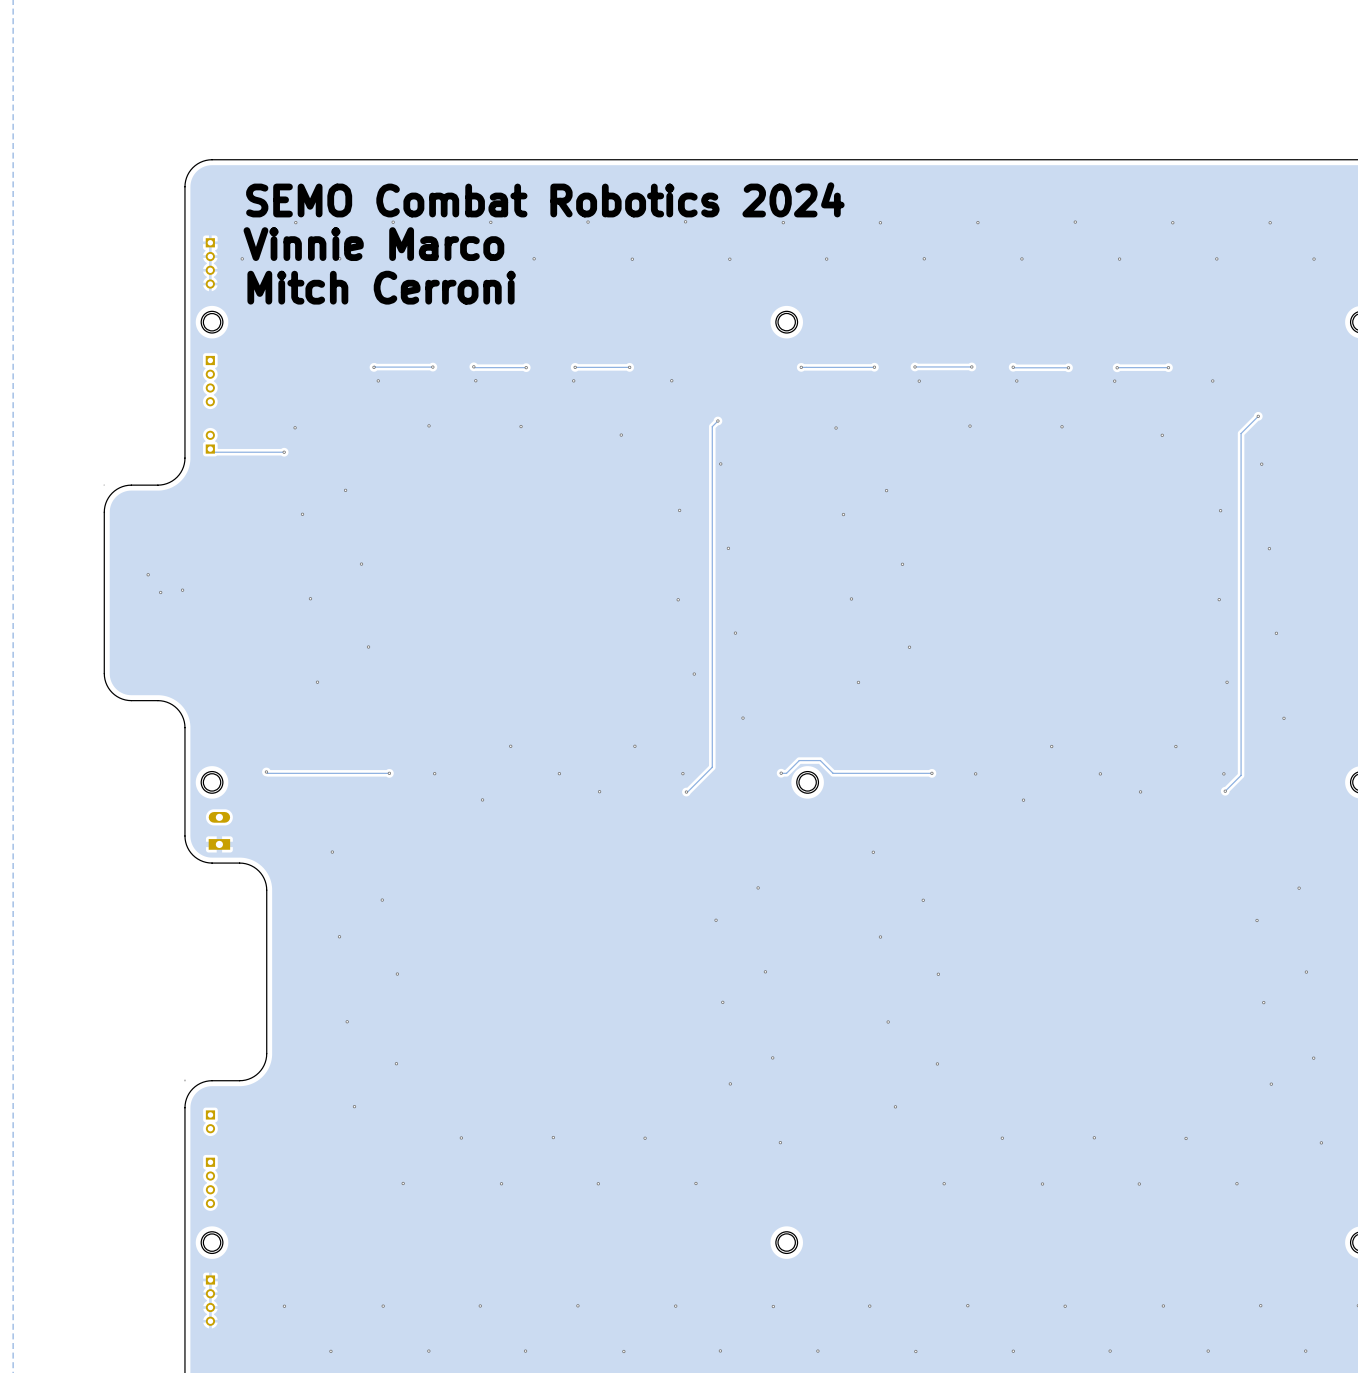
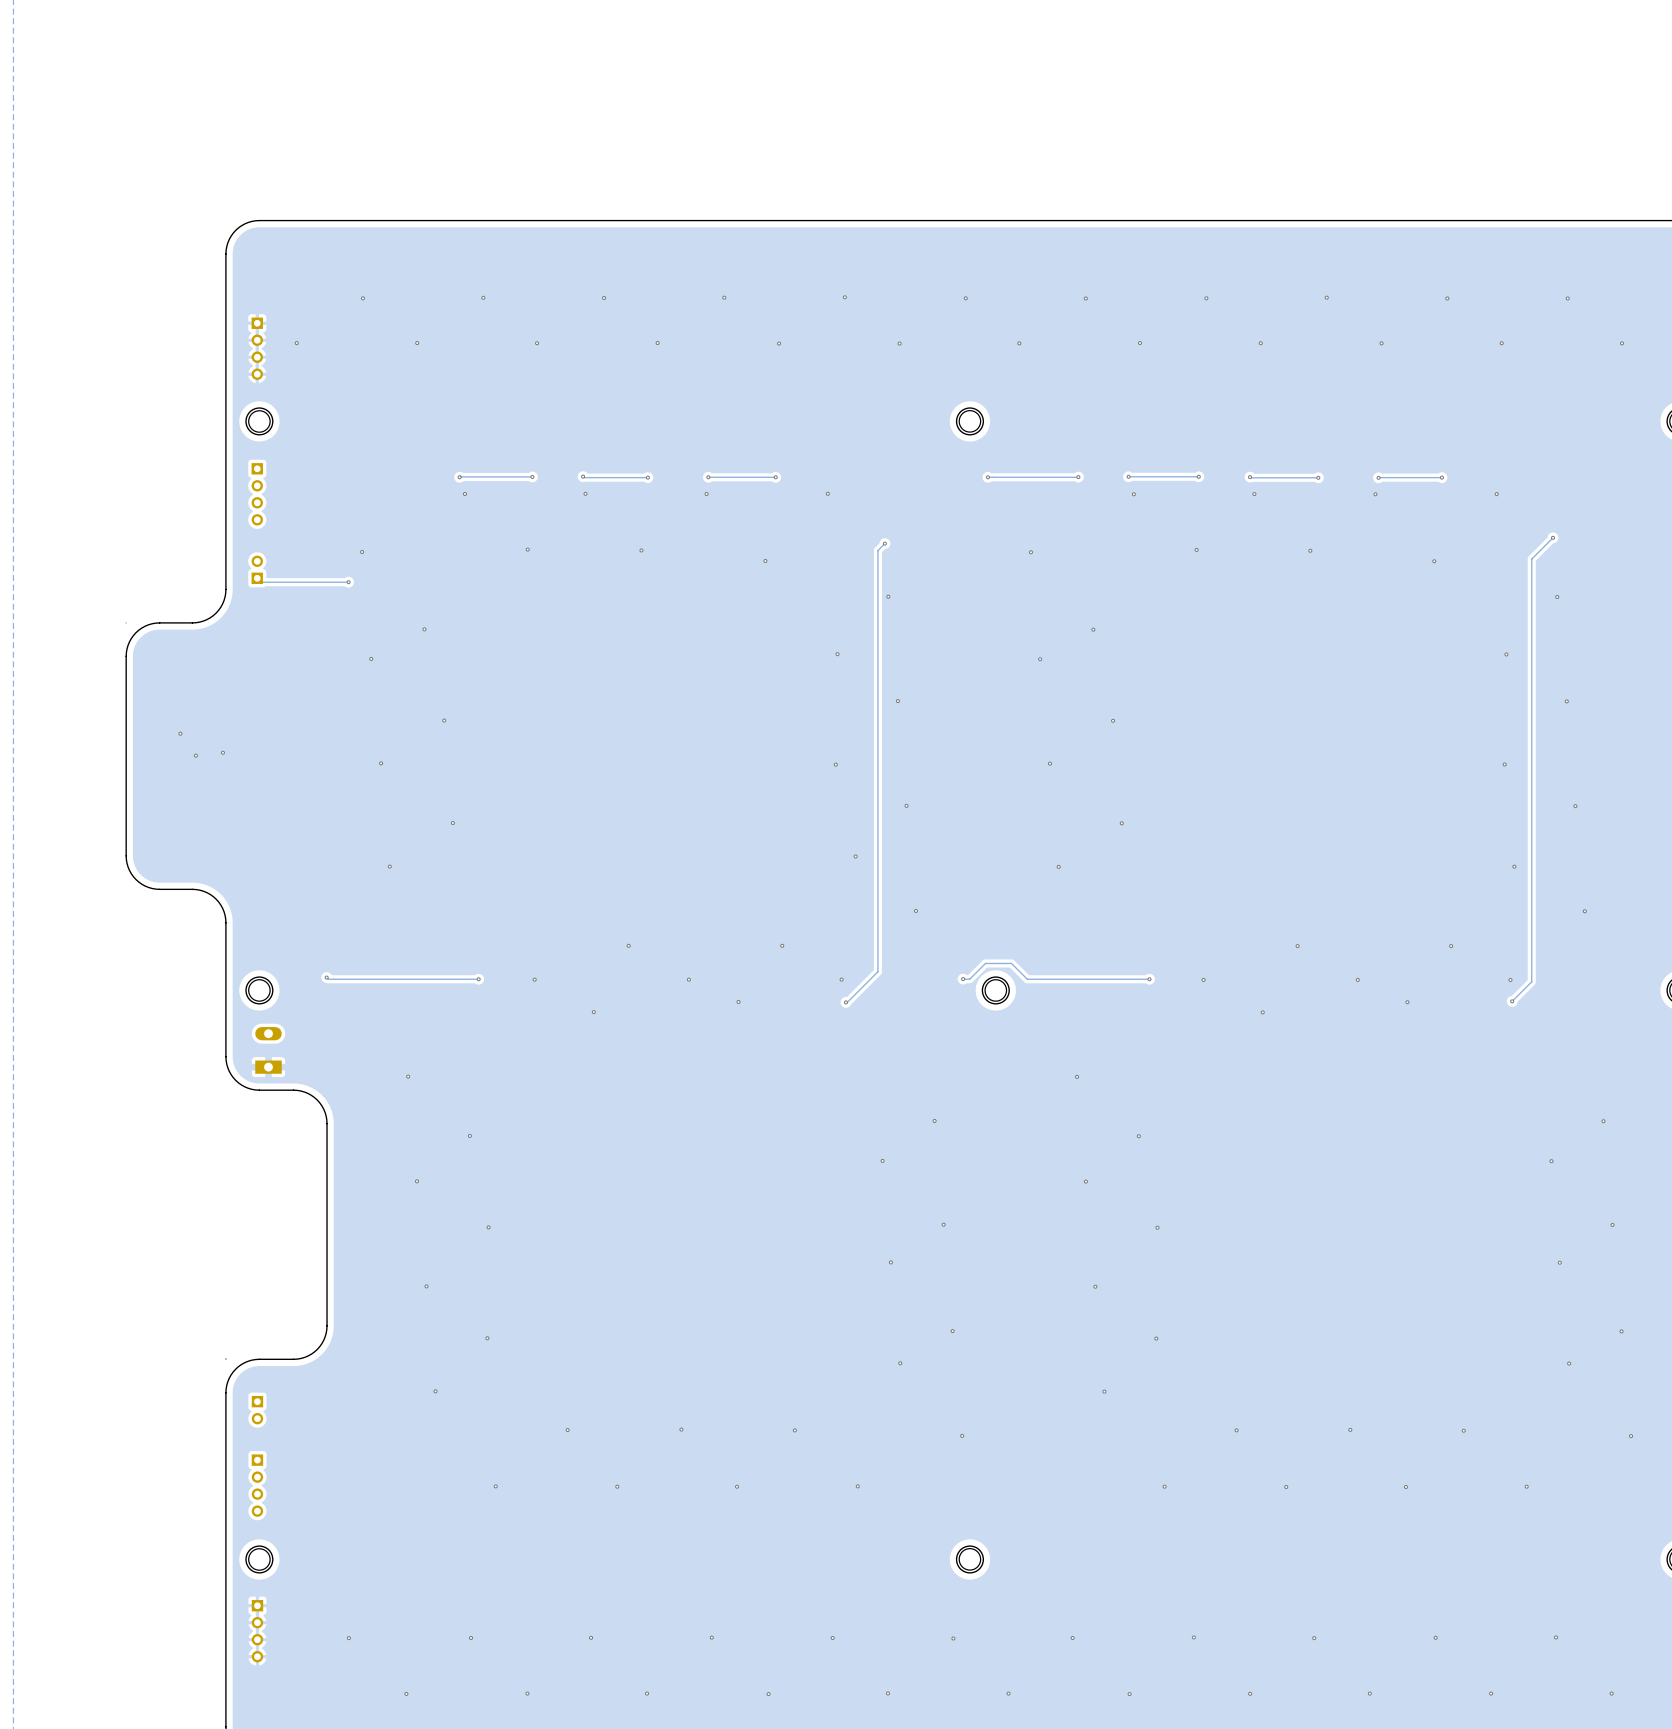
text: SEMO Combat Robotics 2024 (545, 199) -> none
text: Vinnie Marco (373, 244) -> none
text: Mitch Cerroni (381, 287) -> none

